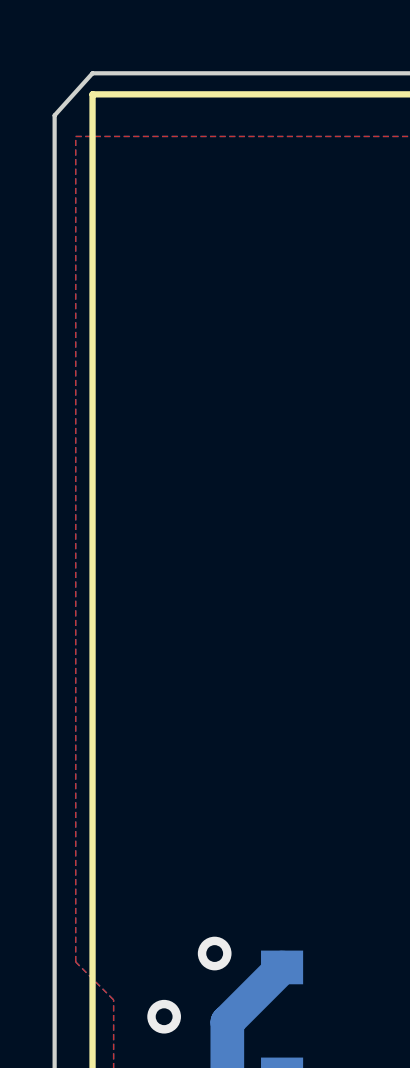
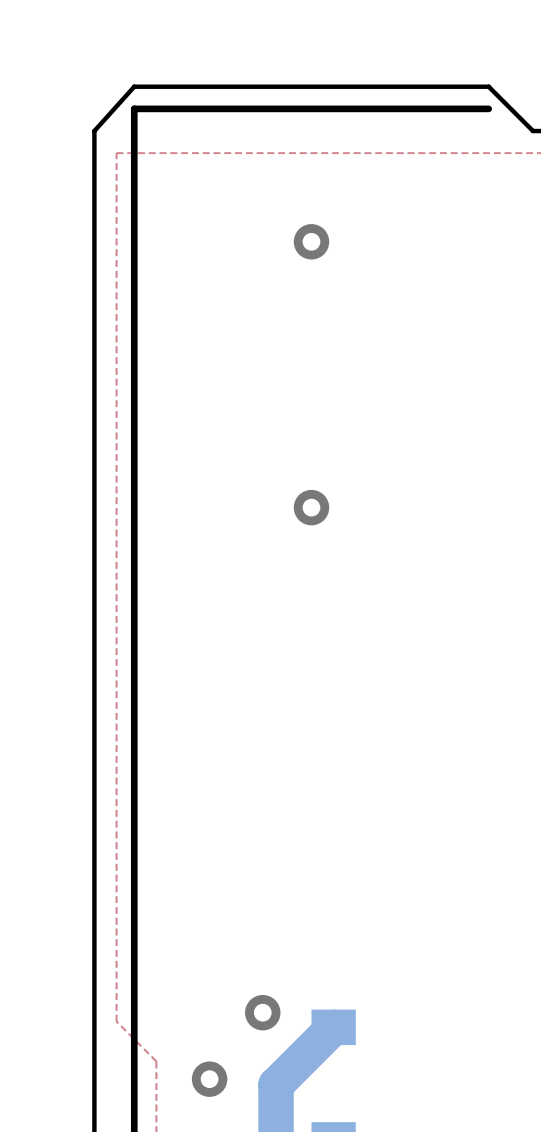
via: none -> (311, 241)
via: none -> (311, 507)

